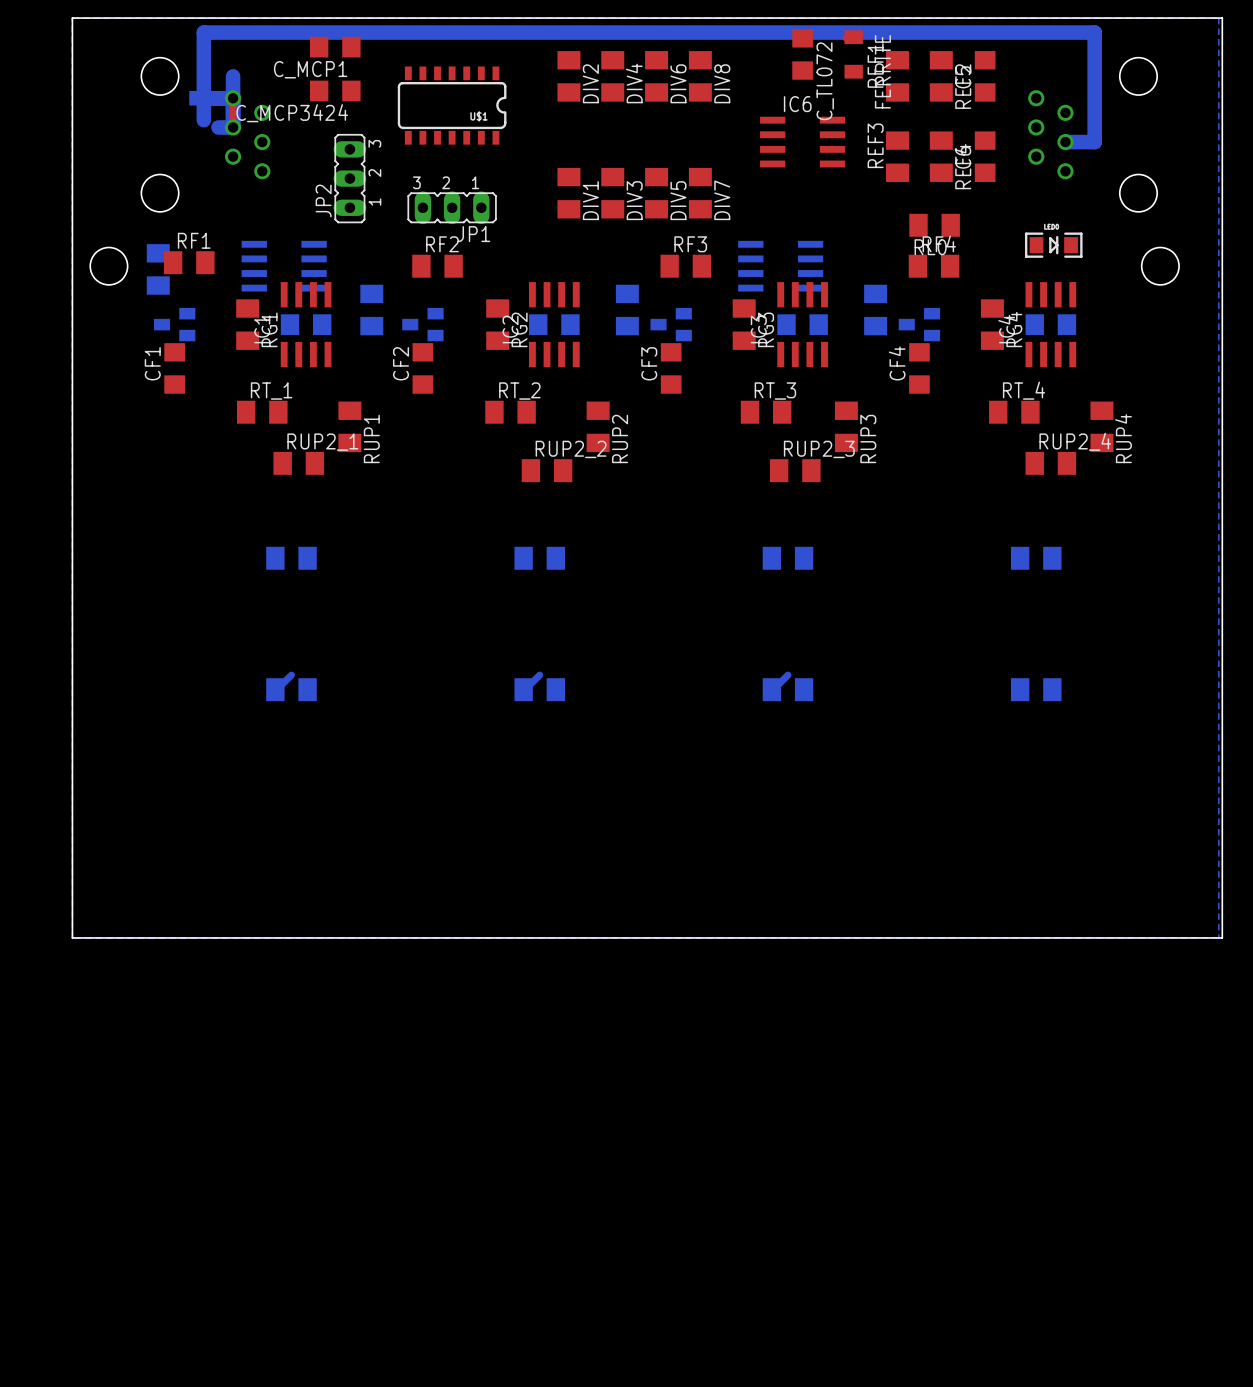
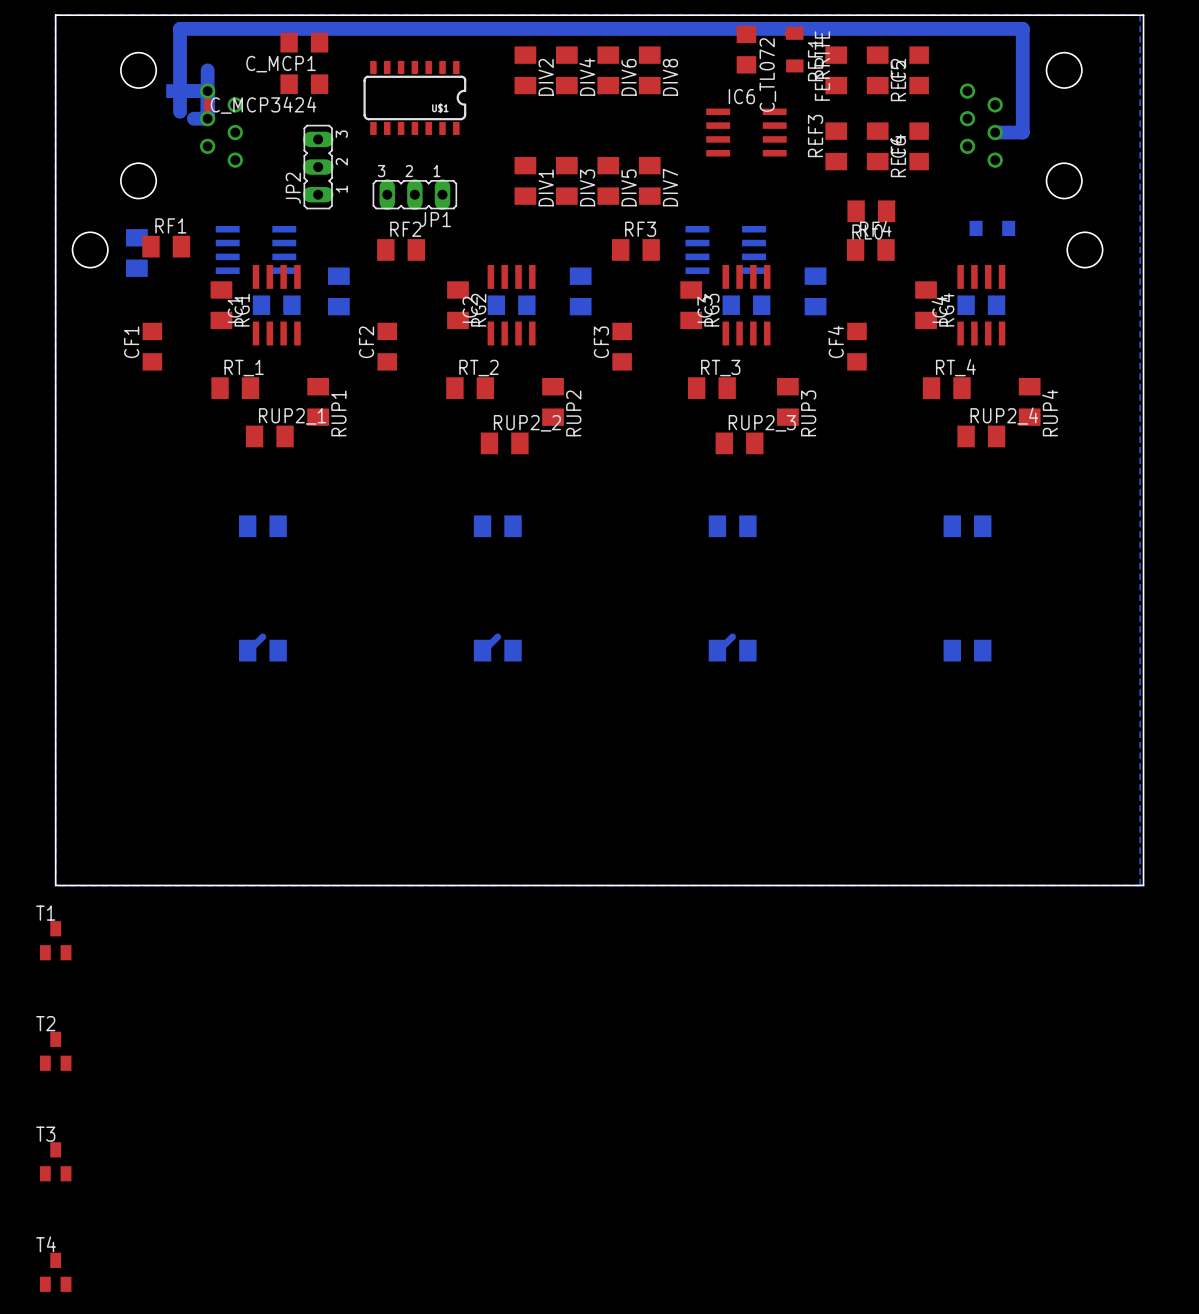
part side: top (1053, 245) -> bottom (992, 228)
part: (174, 324) -> none
part: (422, 324) -> none
part: (671, 324) -> none
part: (919, 324) -> none
T1: none -> (55, 940)
T2: none -> (55, 1051)
T3: none -> (55, 1161)
T4: none -> (55, 1272)

